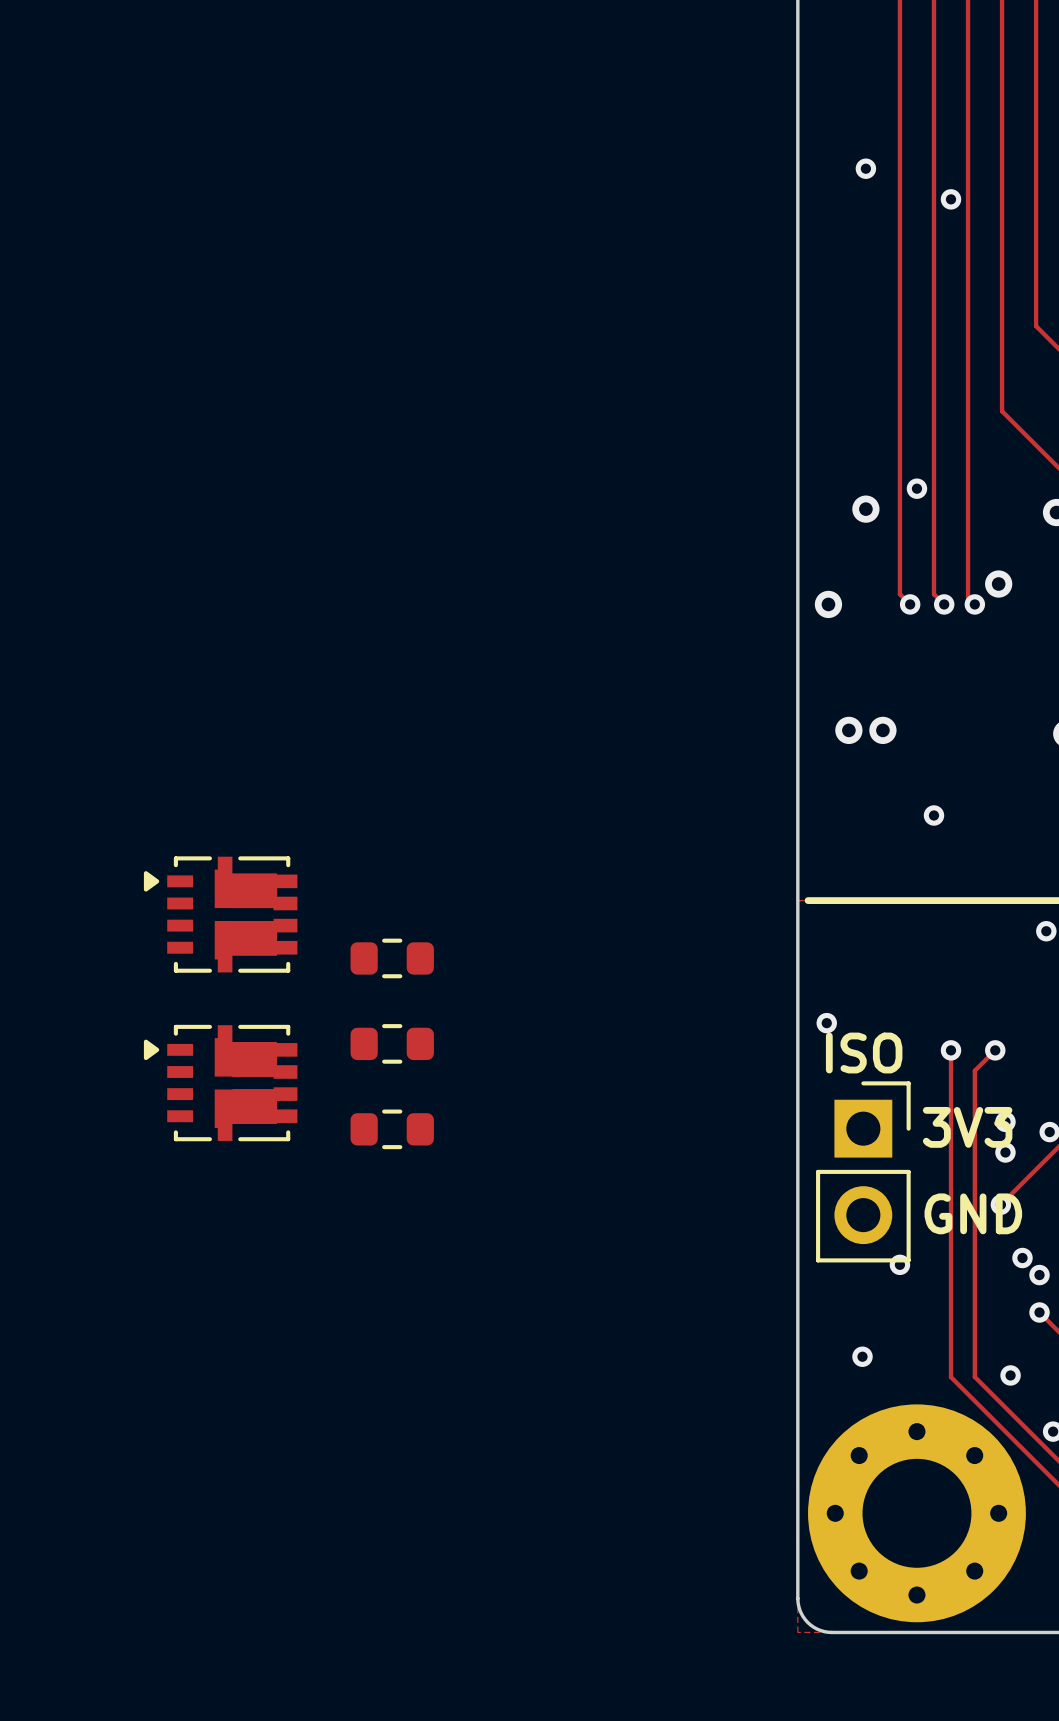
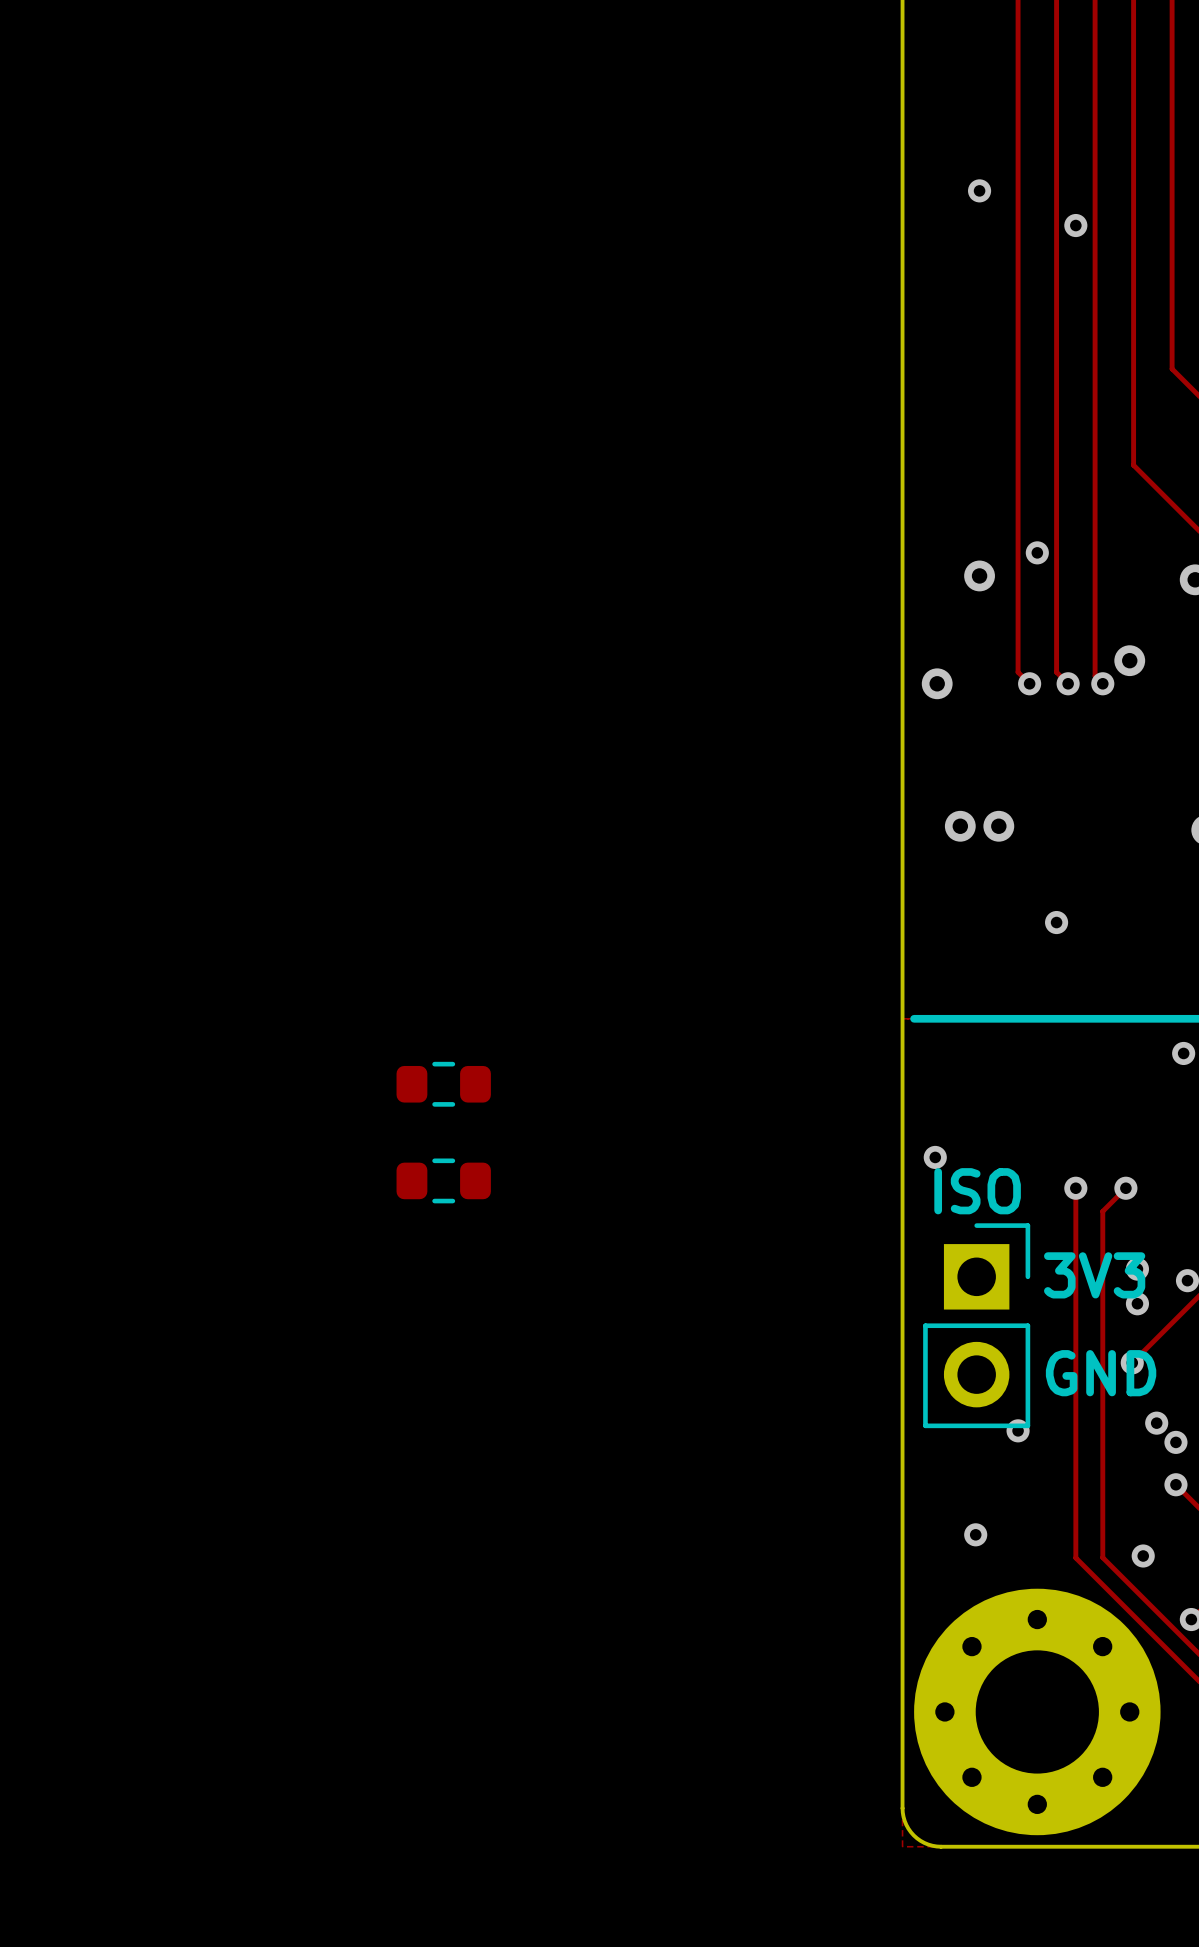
part: (220, 914) -> none
part: (220, 1083) -> none
part: (392, 1129) -> none

